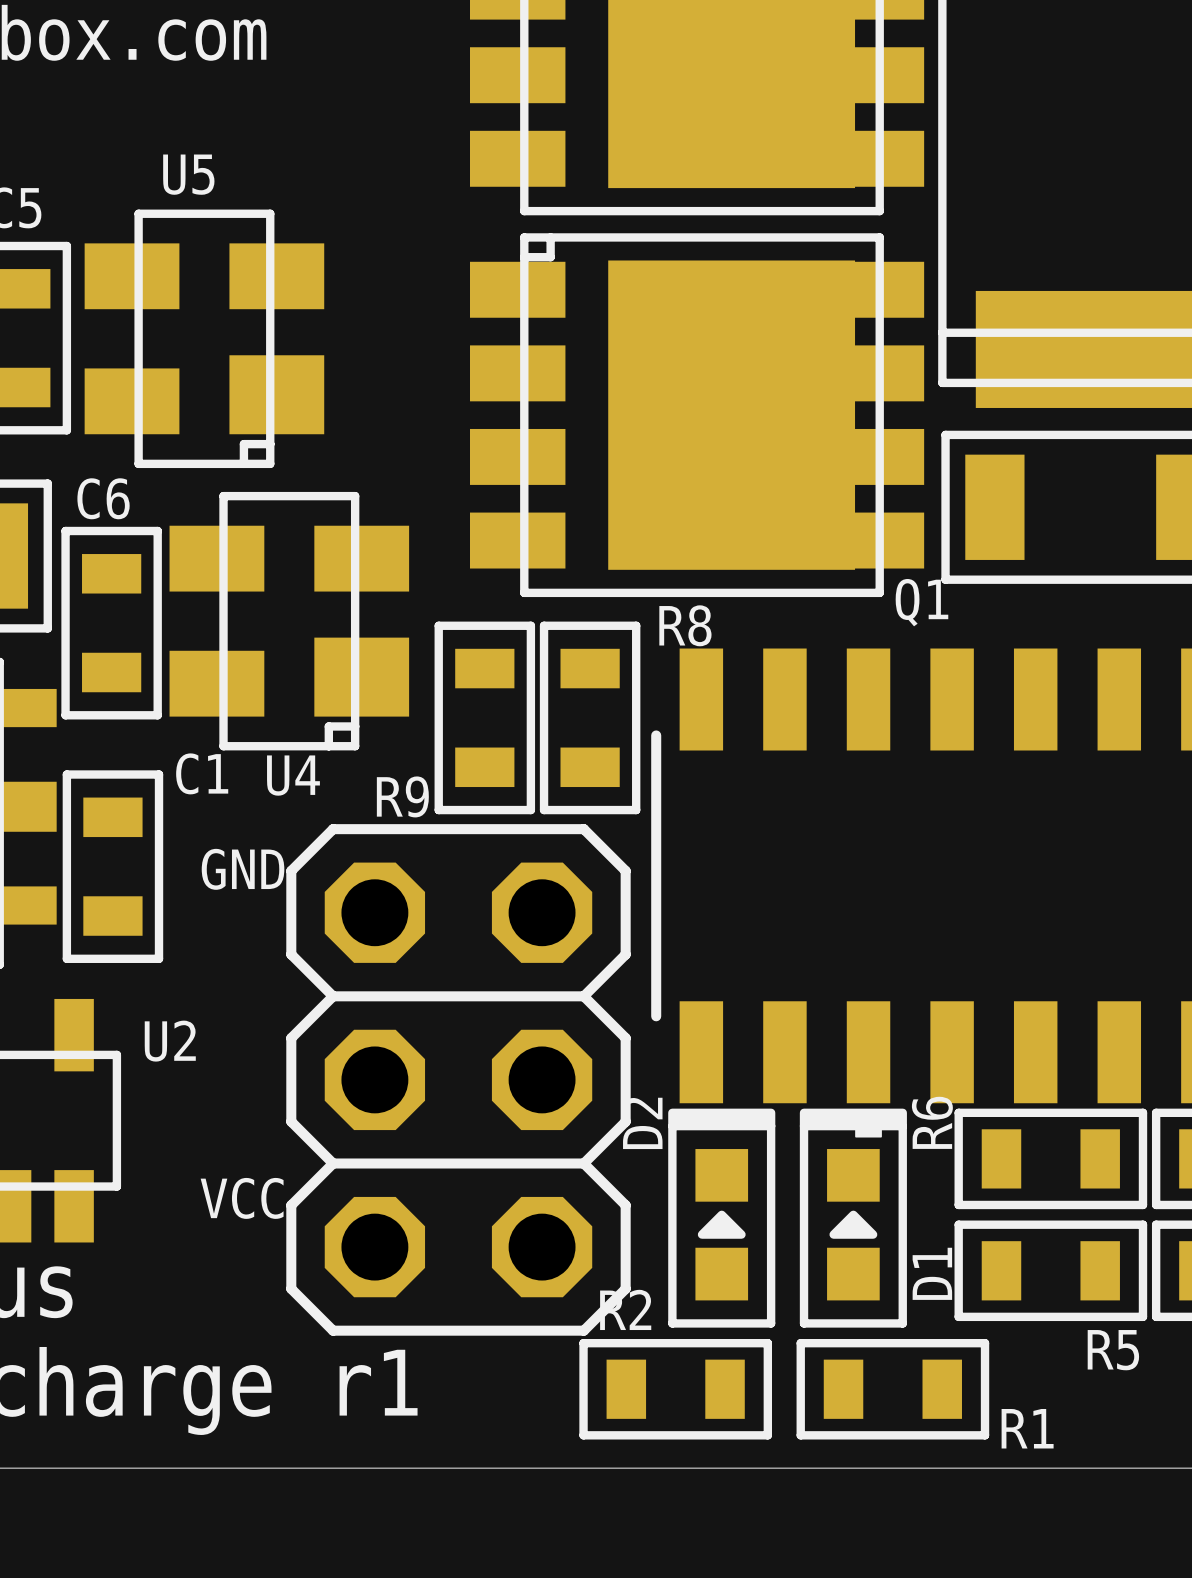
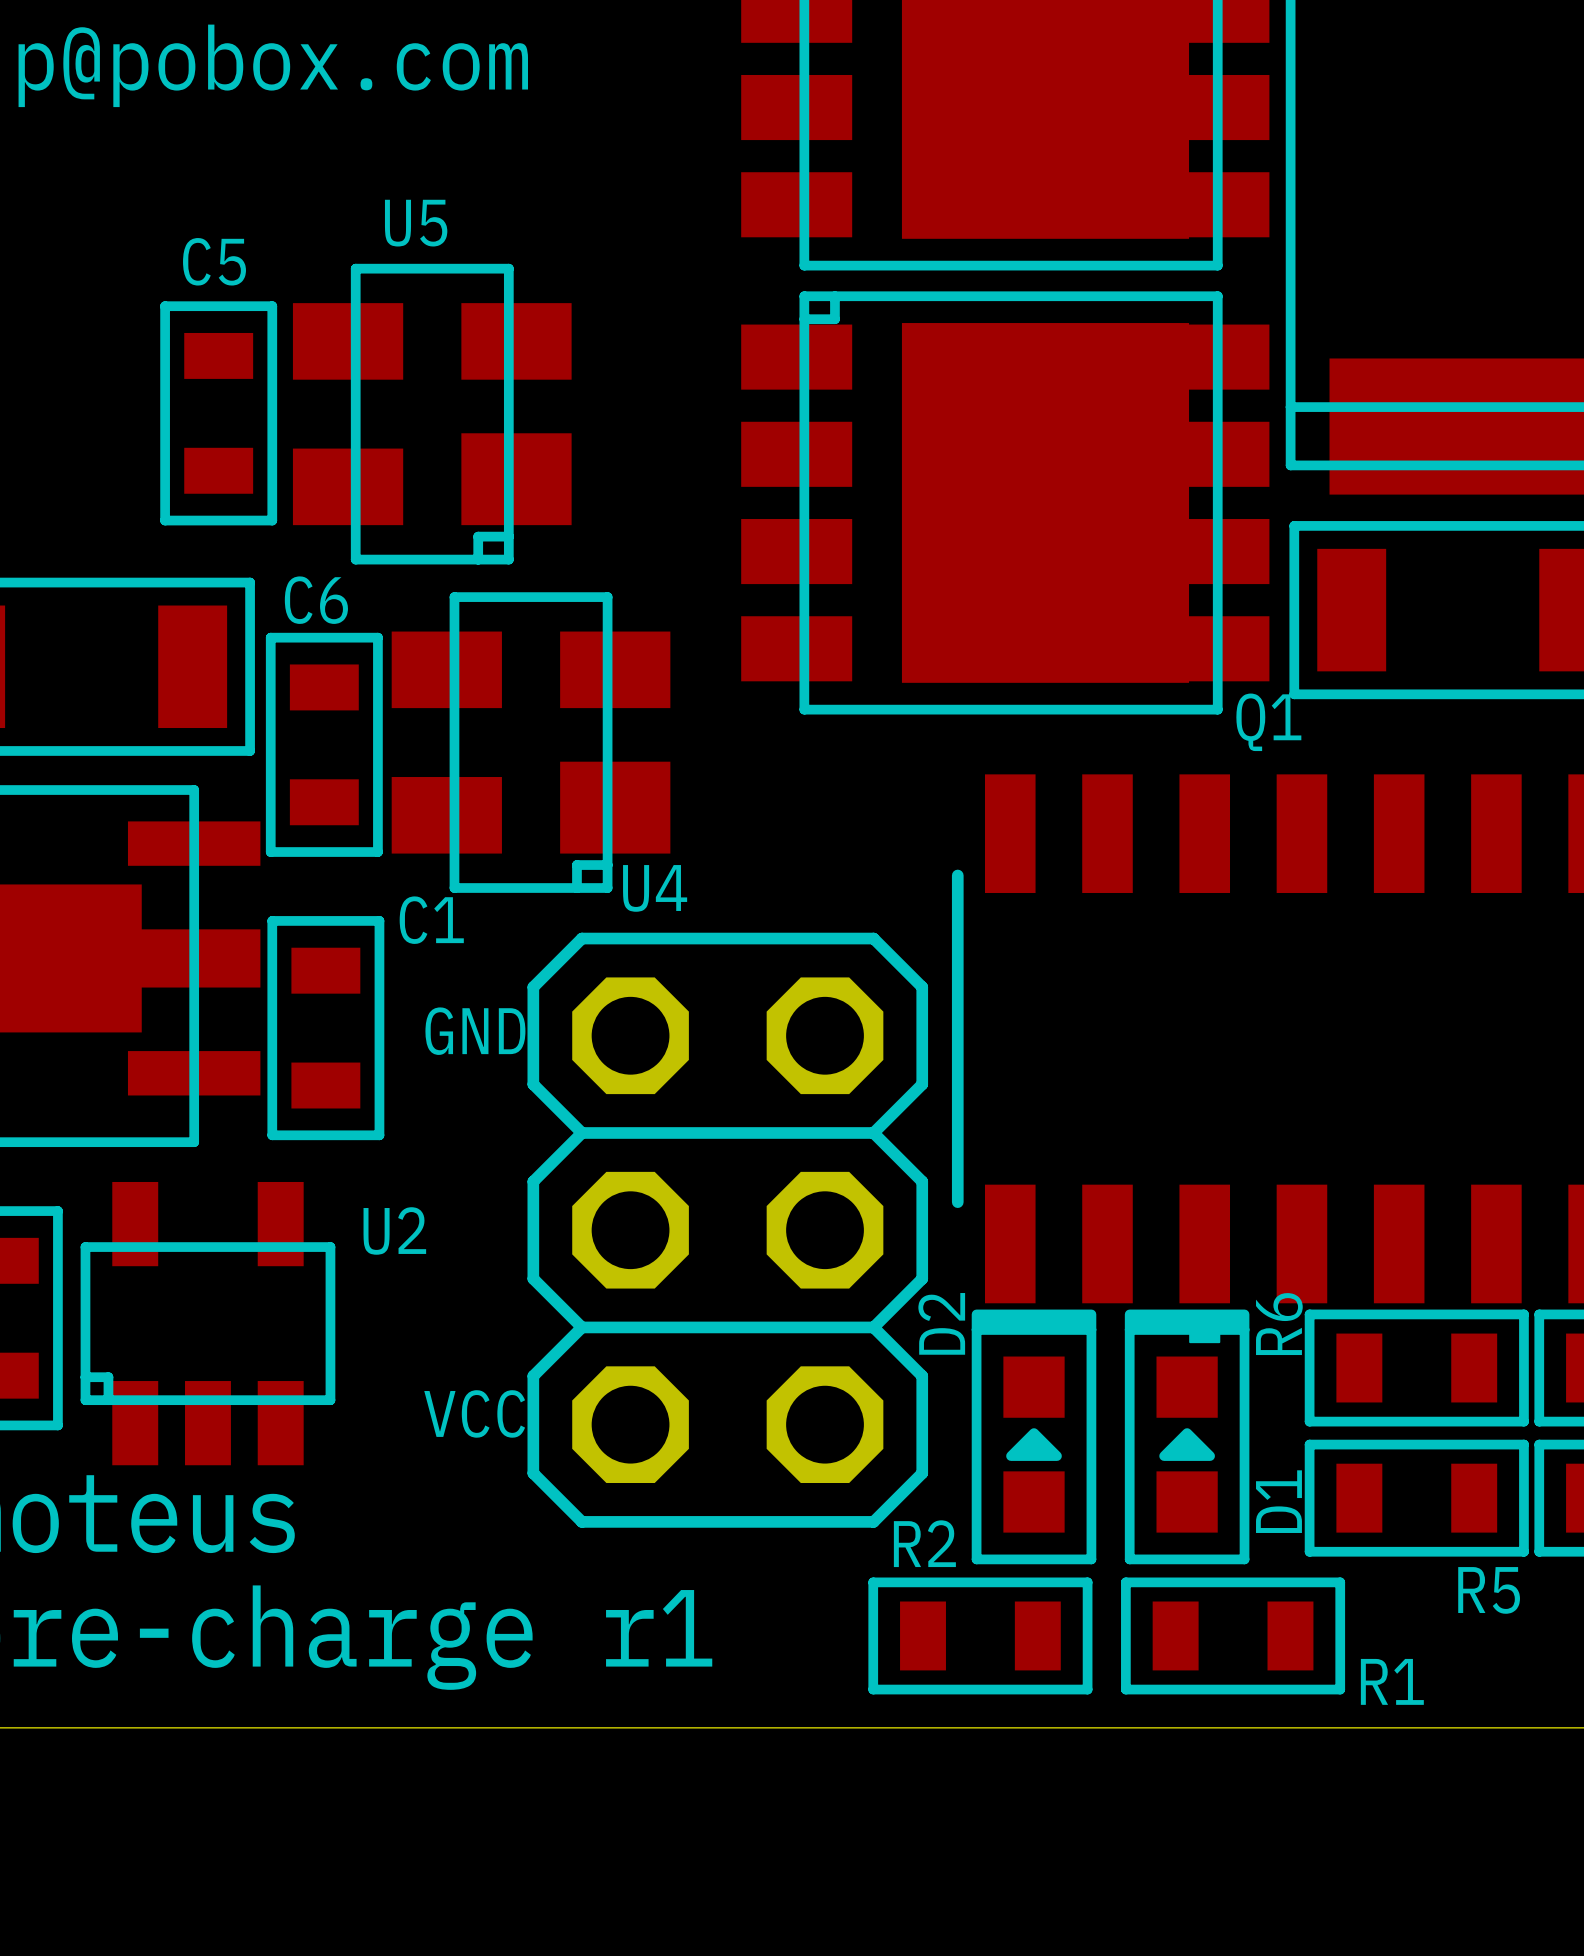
R9: (484, 717) -> none
R8: (590, 717) -> none
U4 name position: U4 (293, 775) -> U4 (655, 888)
part position: (458, 1079) -> (727, 1230)

